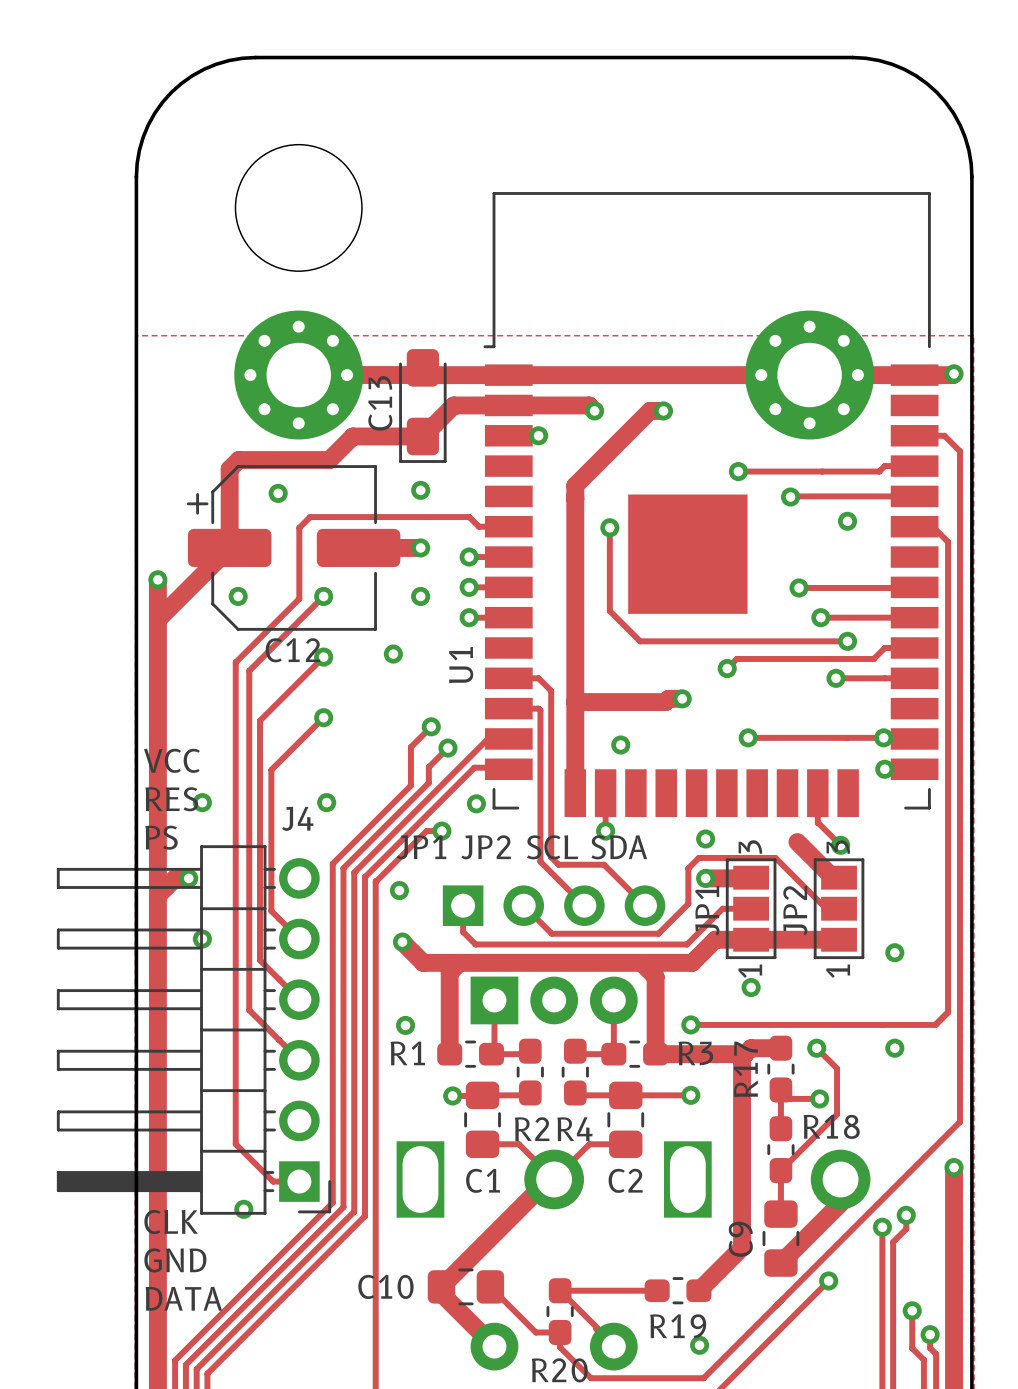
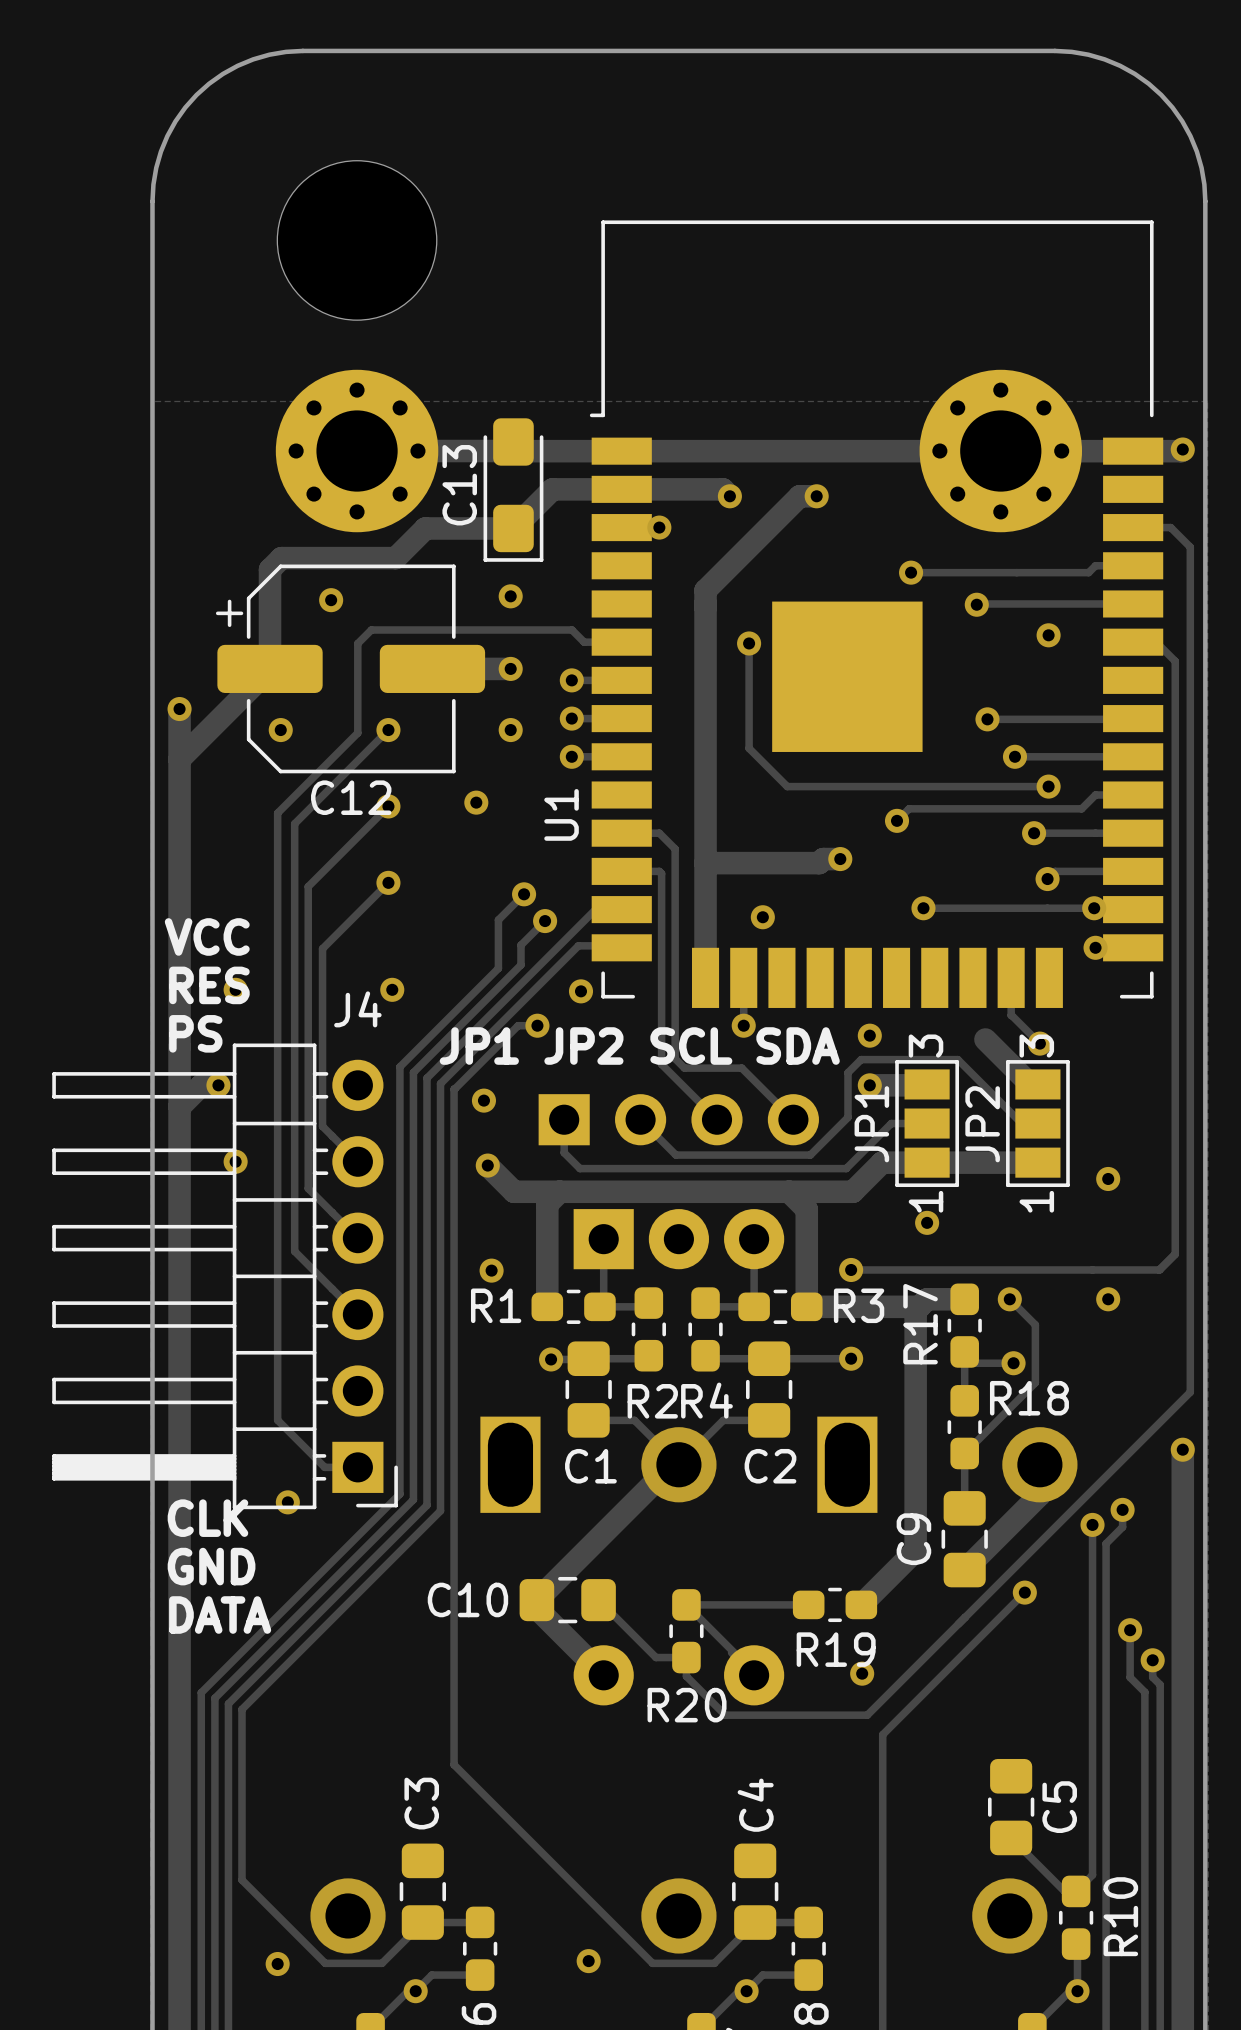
track: none -> (1133, 871) (1055, 871) (1047, 879)
via: none -> (1047, 879)

